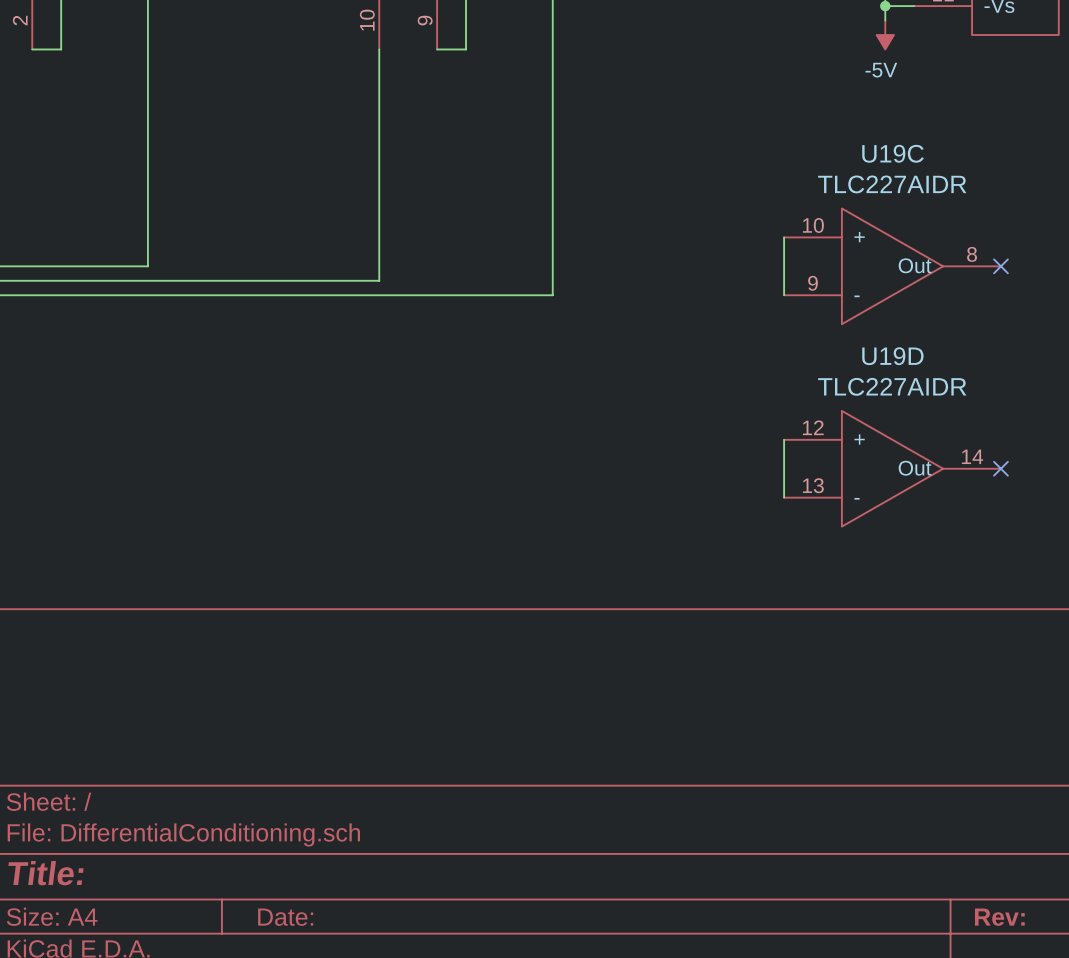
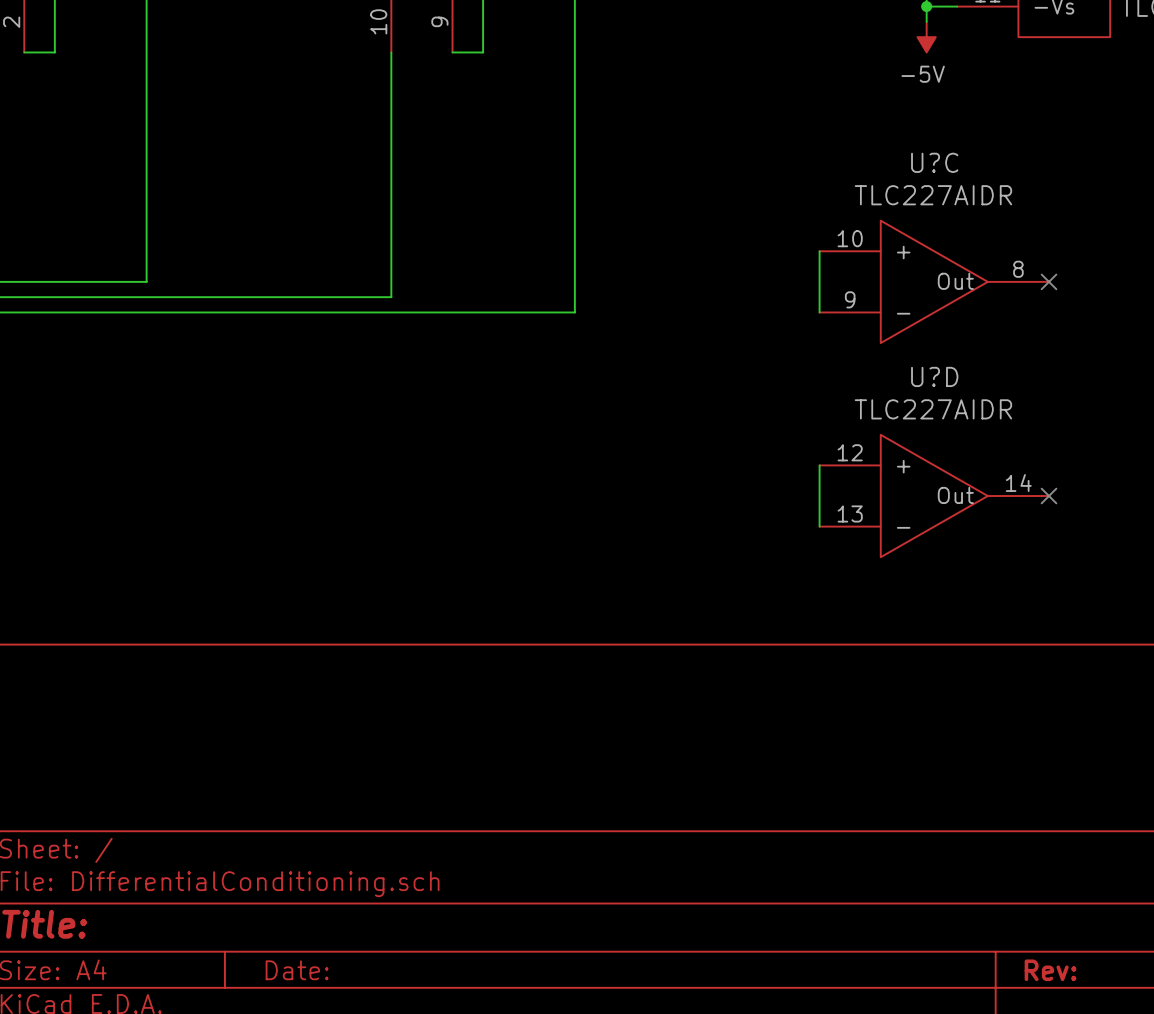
U19C name: U19C (893, 153) -> U?C (934, 162)
U19D name: U19D (892, 356) -> U?D (934, 376)

